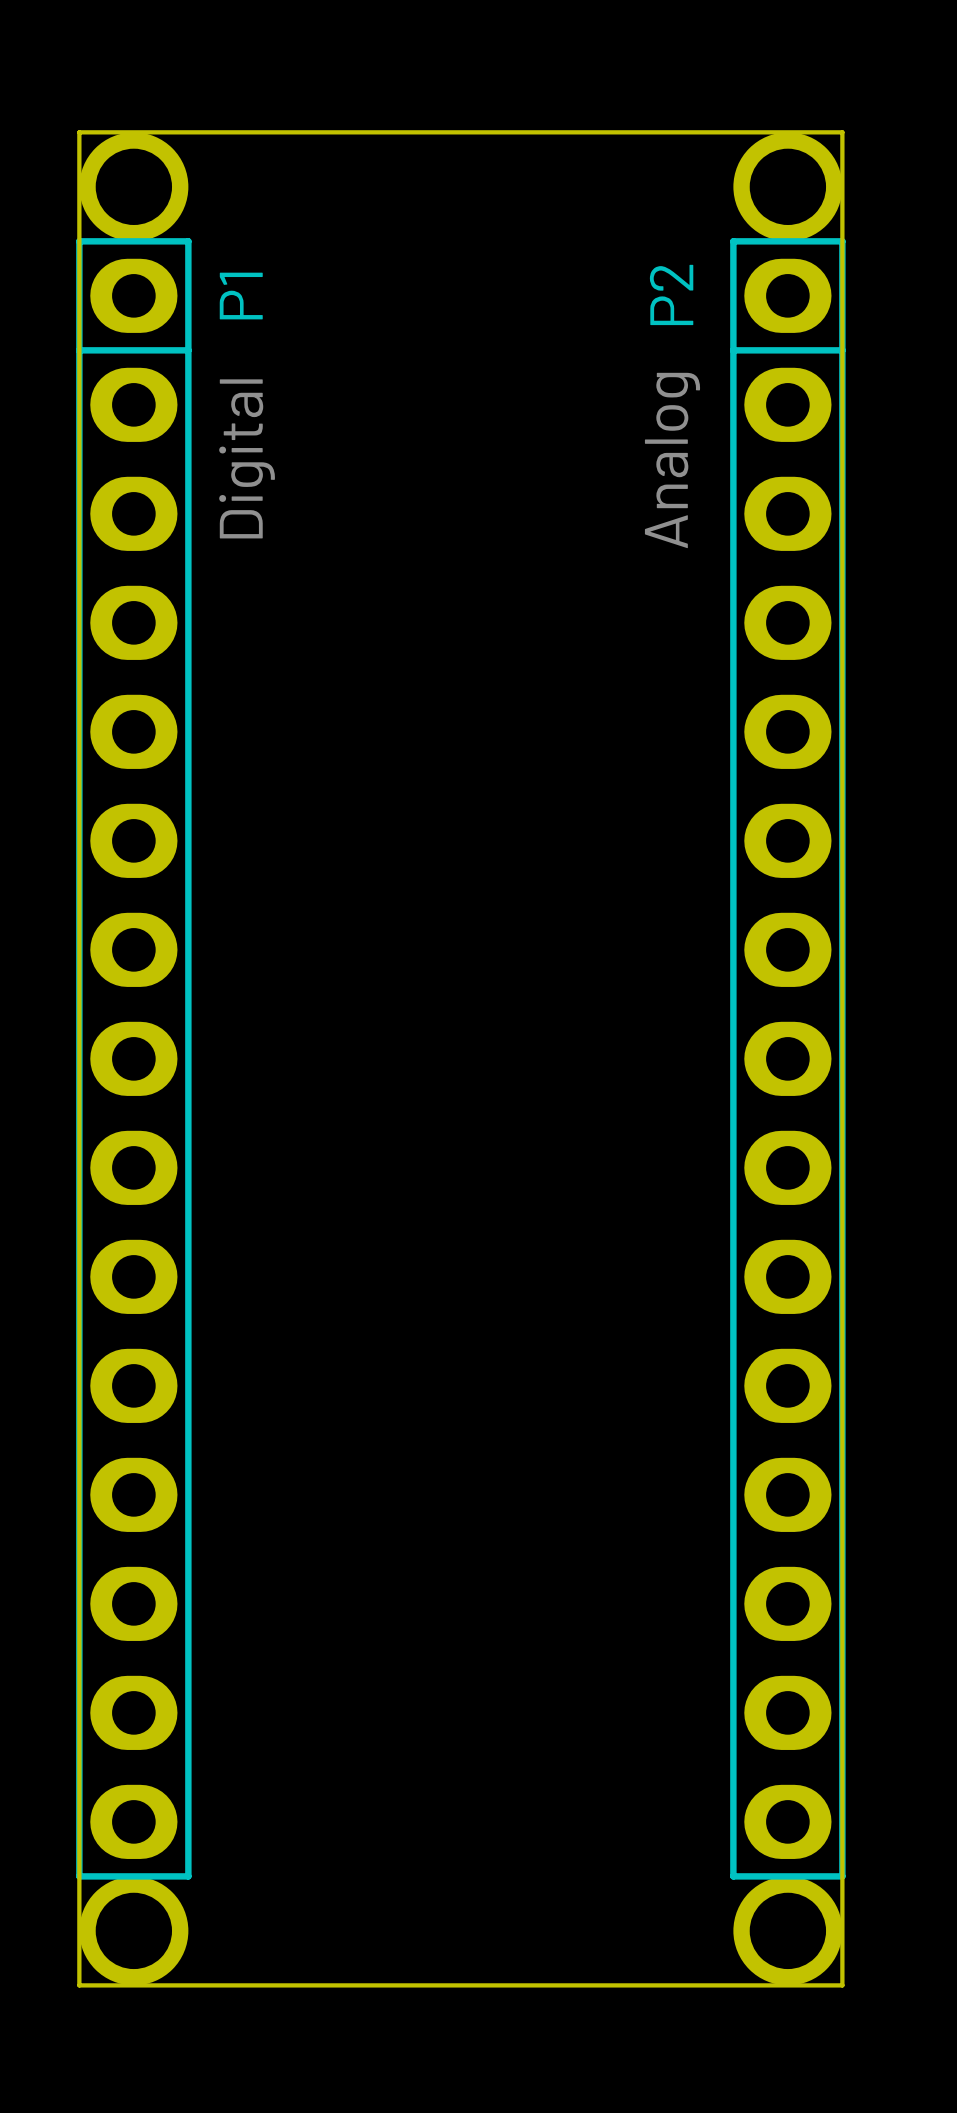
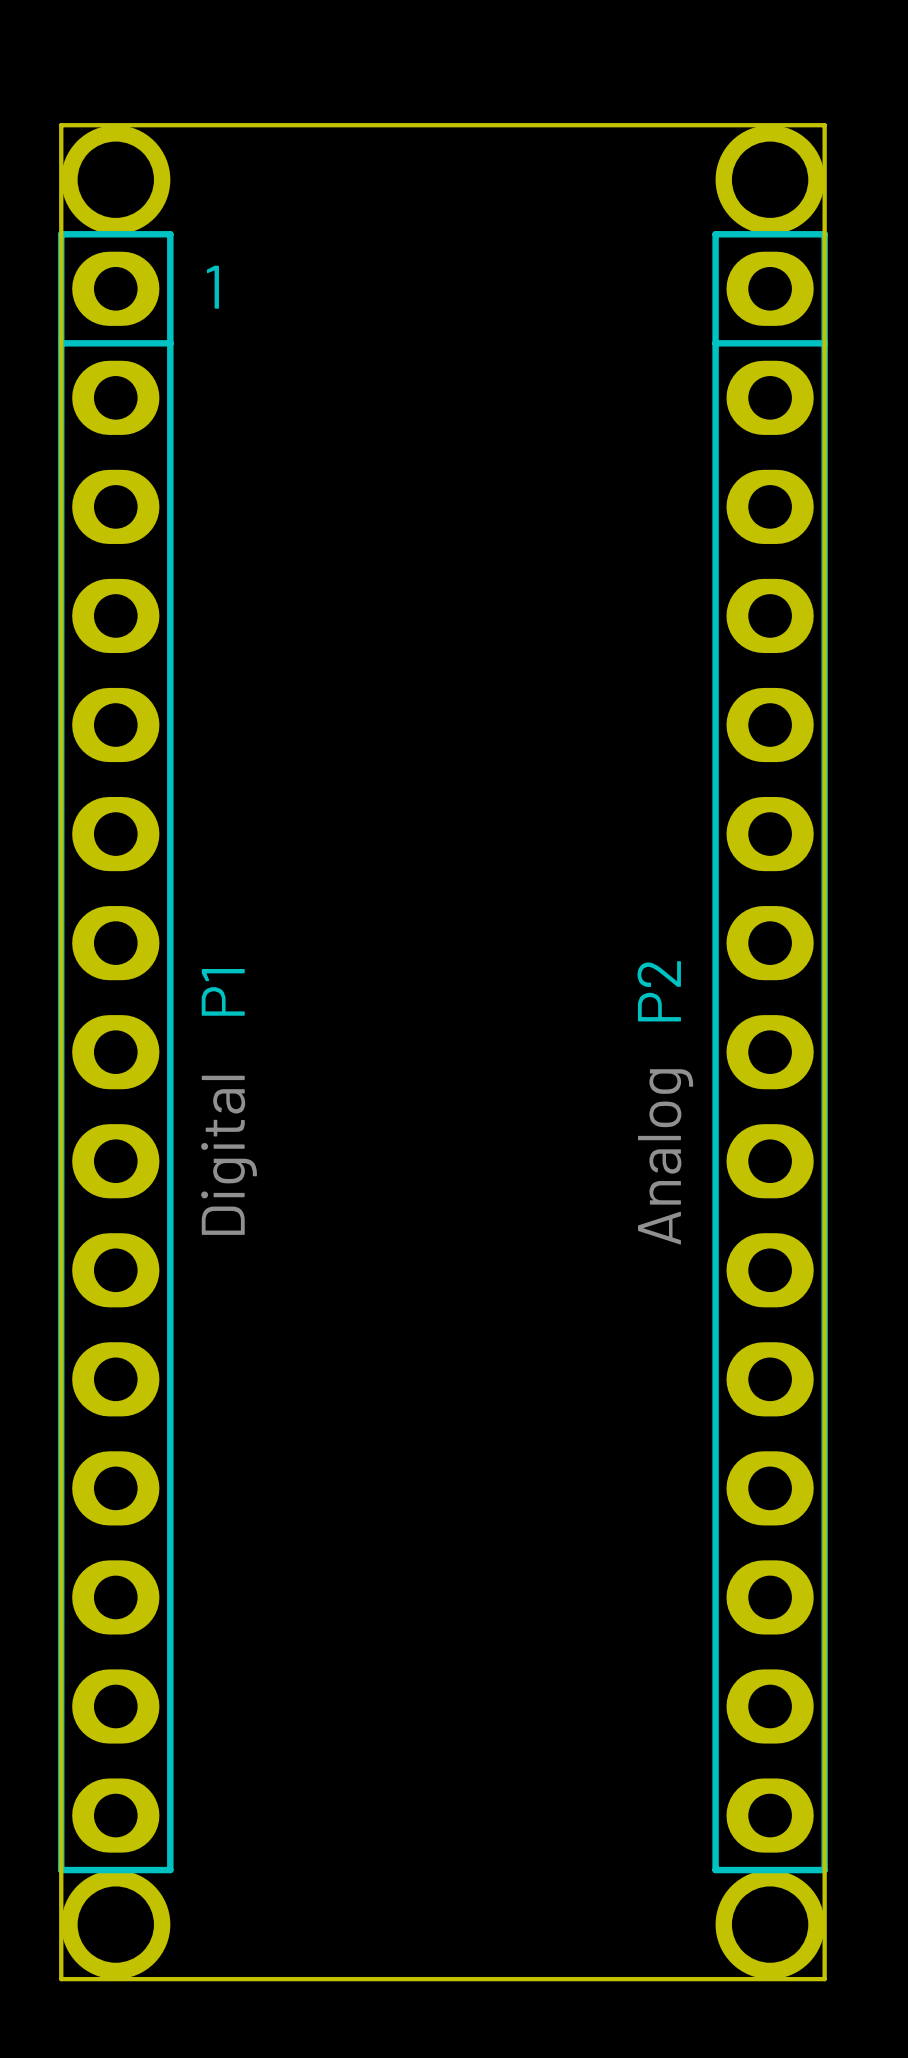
text: none -> 1 (212, 287)
P2 name position: P2 (671, 294) -> P2 (659, 991)
P1 name position: P1 (241, 296) -> P1 (223, 992)
P1 value position: Digital (247, 458) -> Digital (229, 1155)
P2 value position: Analog (672, 460) -> Analog (665, 1156)

